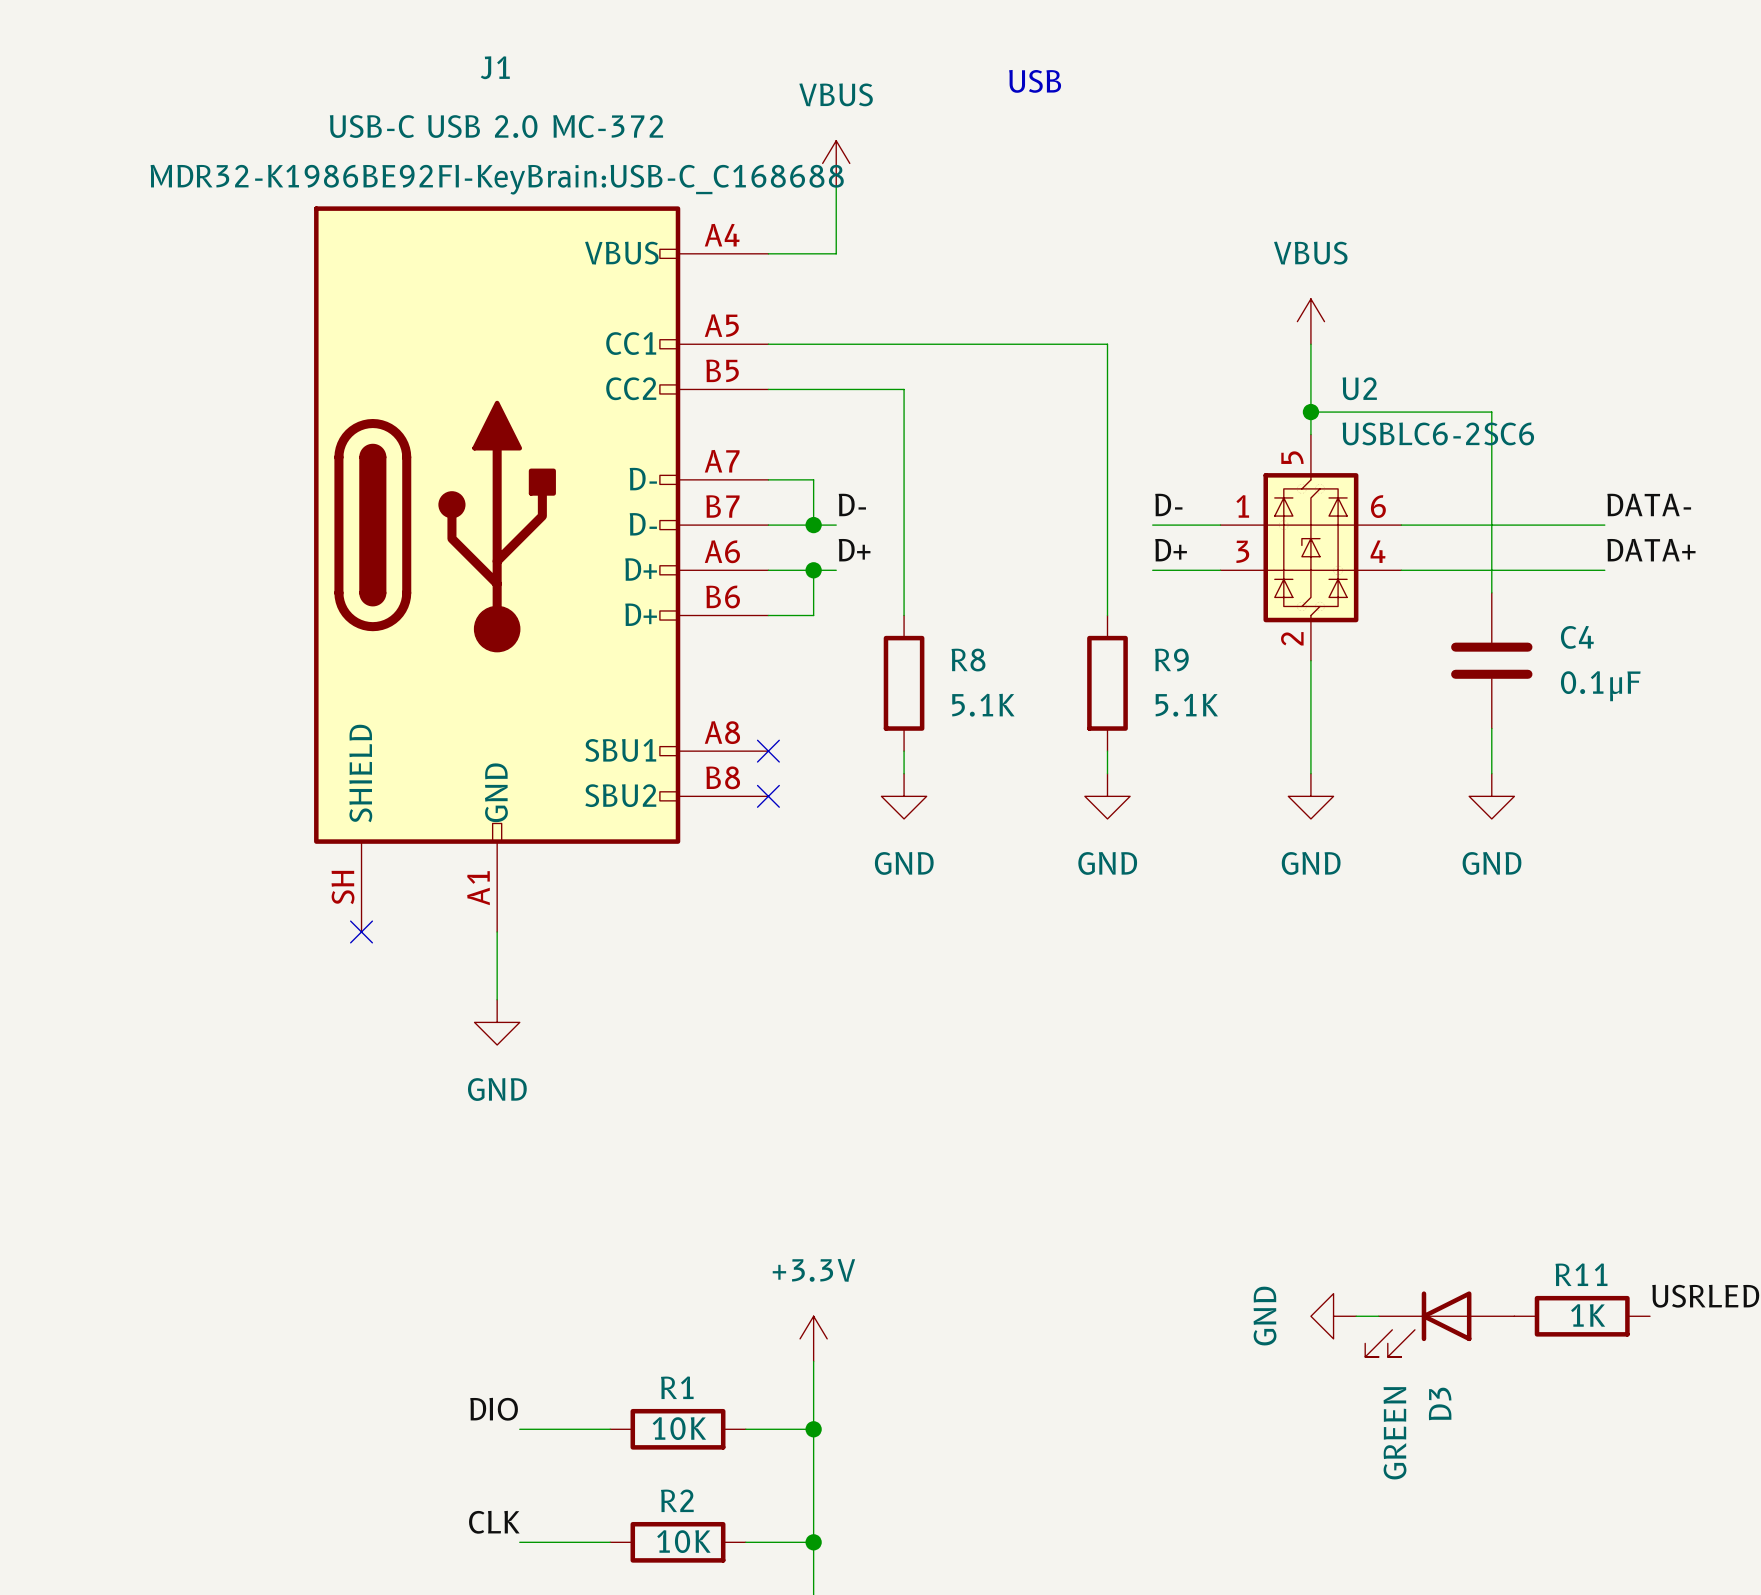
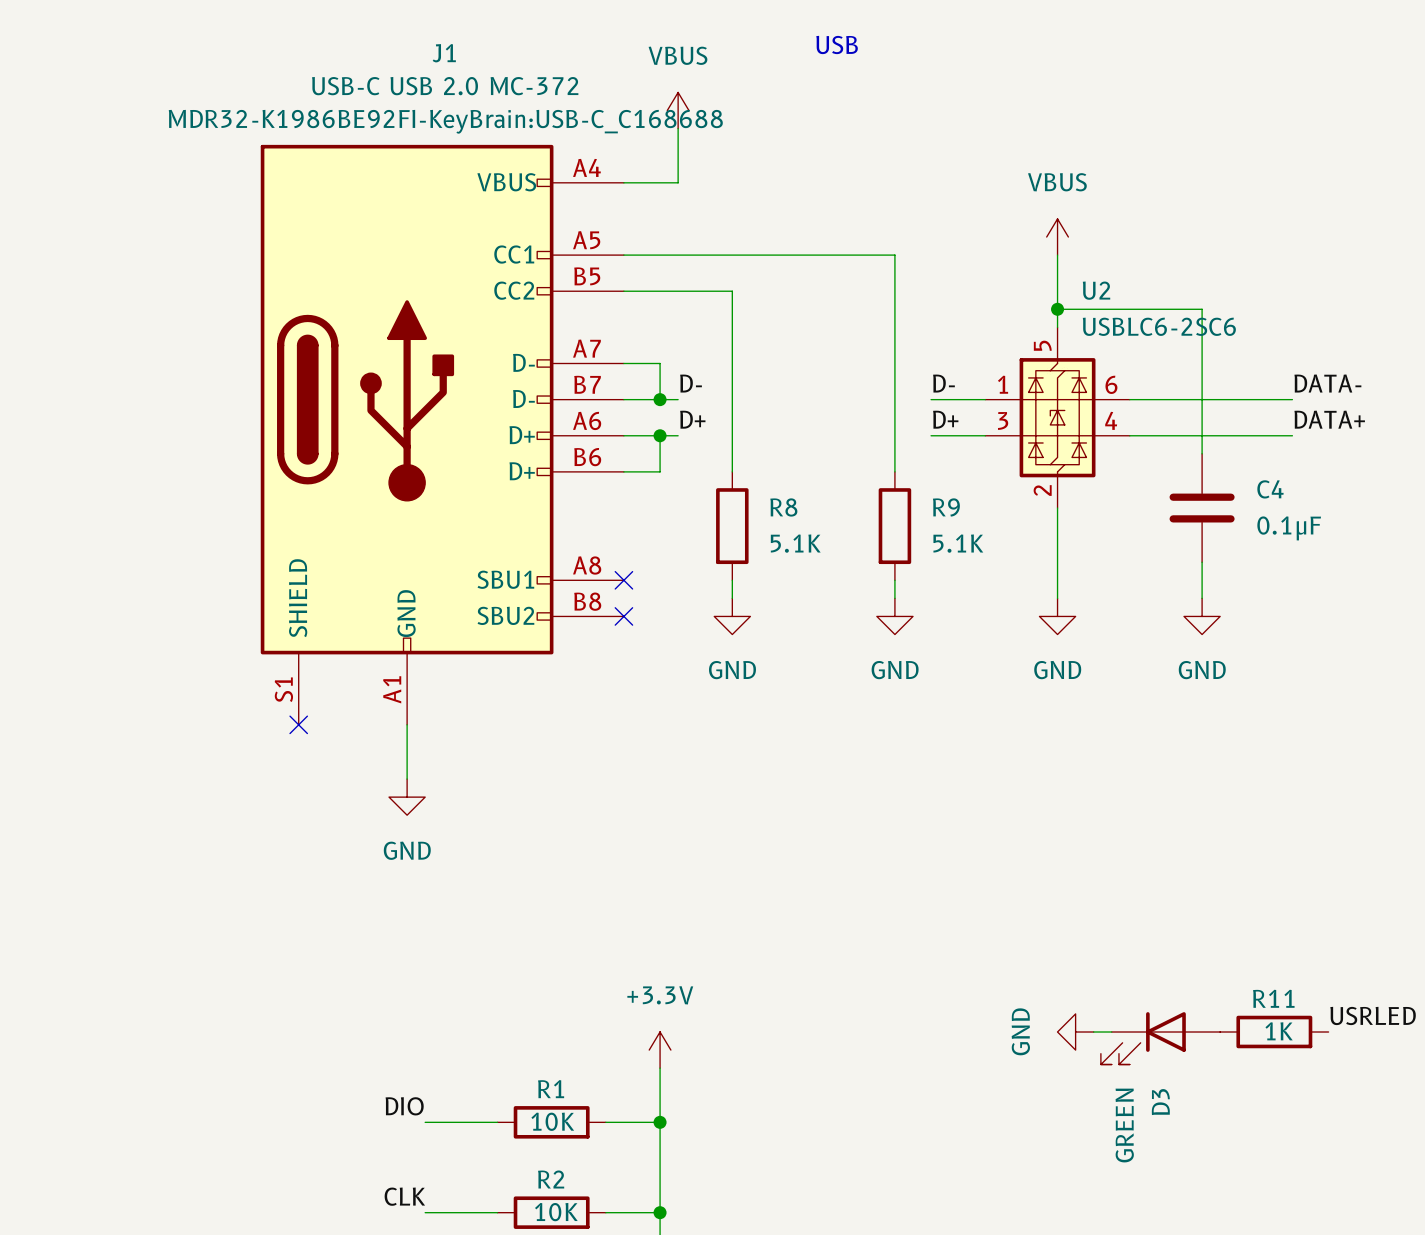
J1 name position: J1 (495, 67) -> J1 (444, 53)
J1 value position: USB-C USB 2.0 MC-372 (496, 126) -> USB-C USB 2.0 MC-372 (445, 86)
J1 text position: MDR32-K1986BE92FI-KeyBrain:USB-C_C168688 (497, 179) -> MDR32-K1986BE92FI-KeyBrain:USB-C_C168688 (445, 121)
J1 pin number: SH (343, 887) -> S1 (283, 689)

